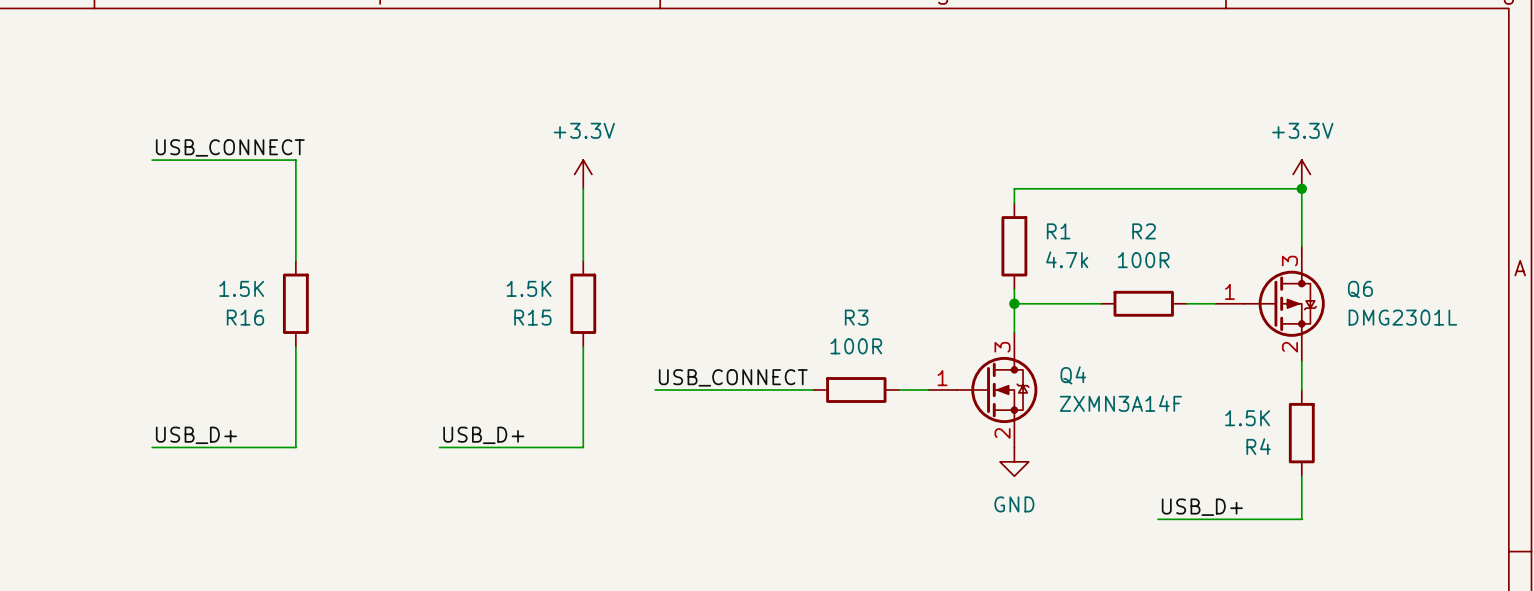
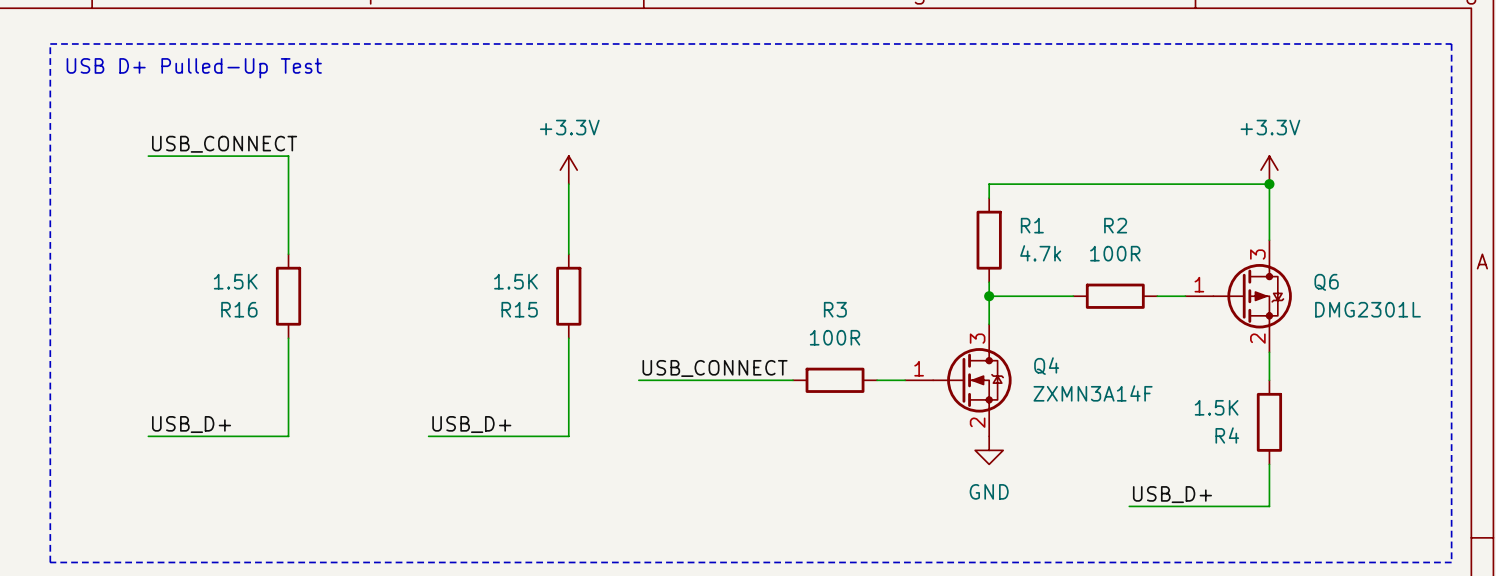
line: none -> (50, 43) (1451, 43) (1451, 562) (50, 562) (50, 43)
text: none -> USB D+ Pulled-Up Test (194, 68)

